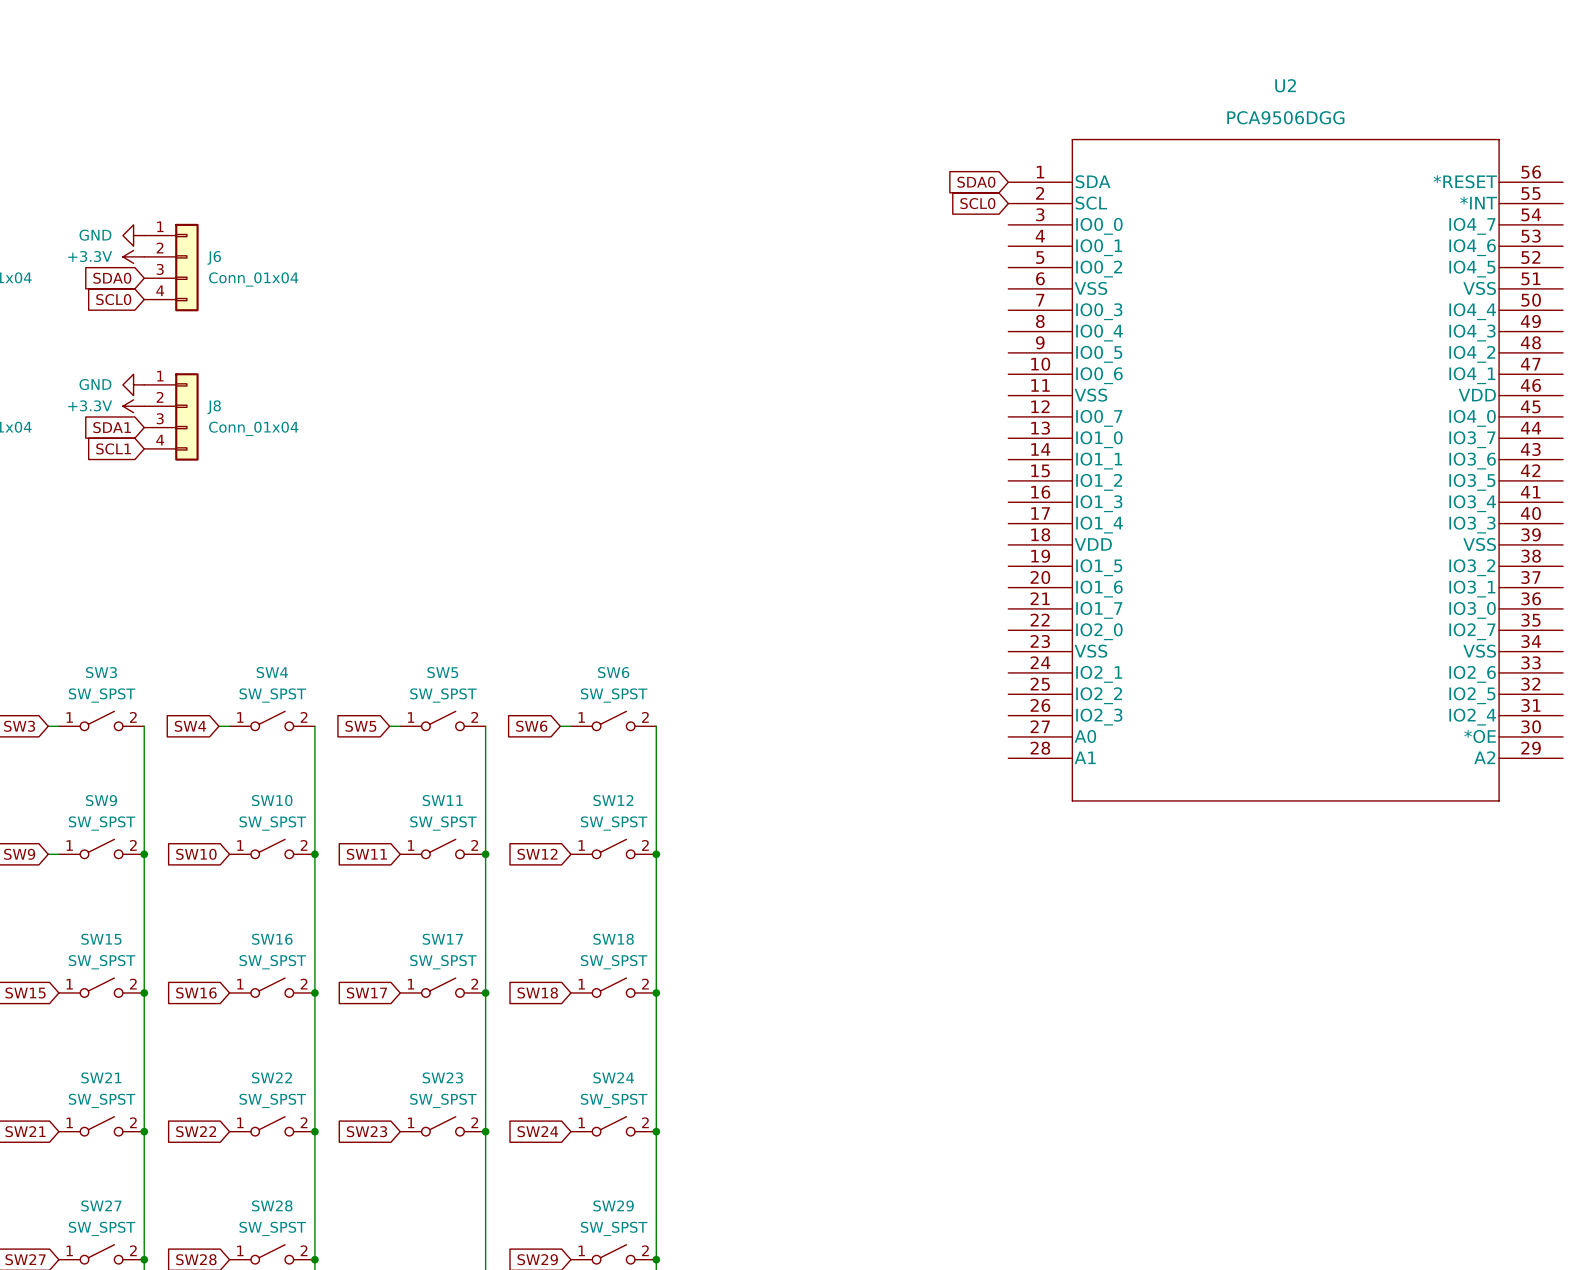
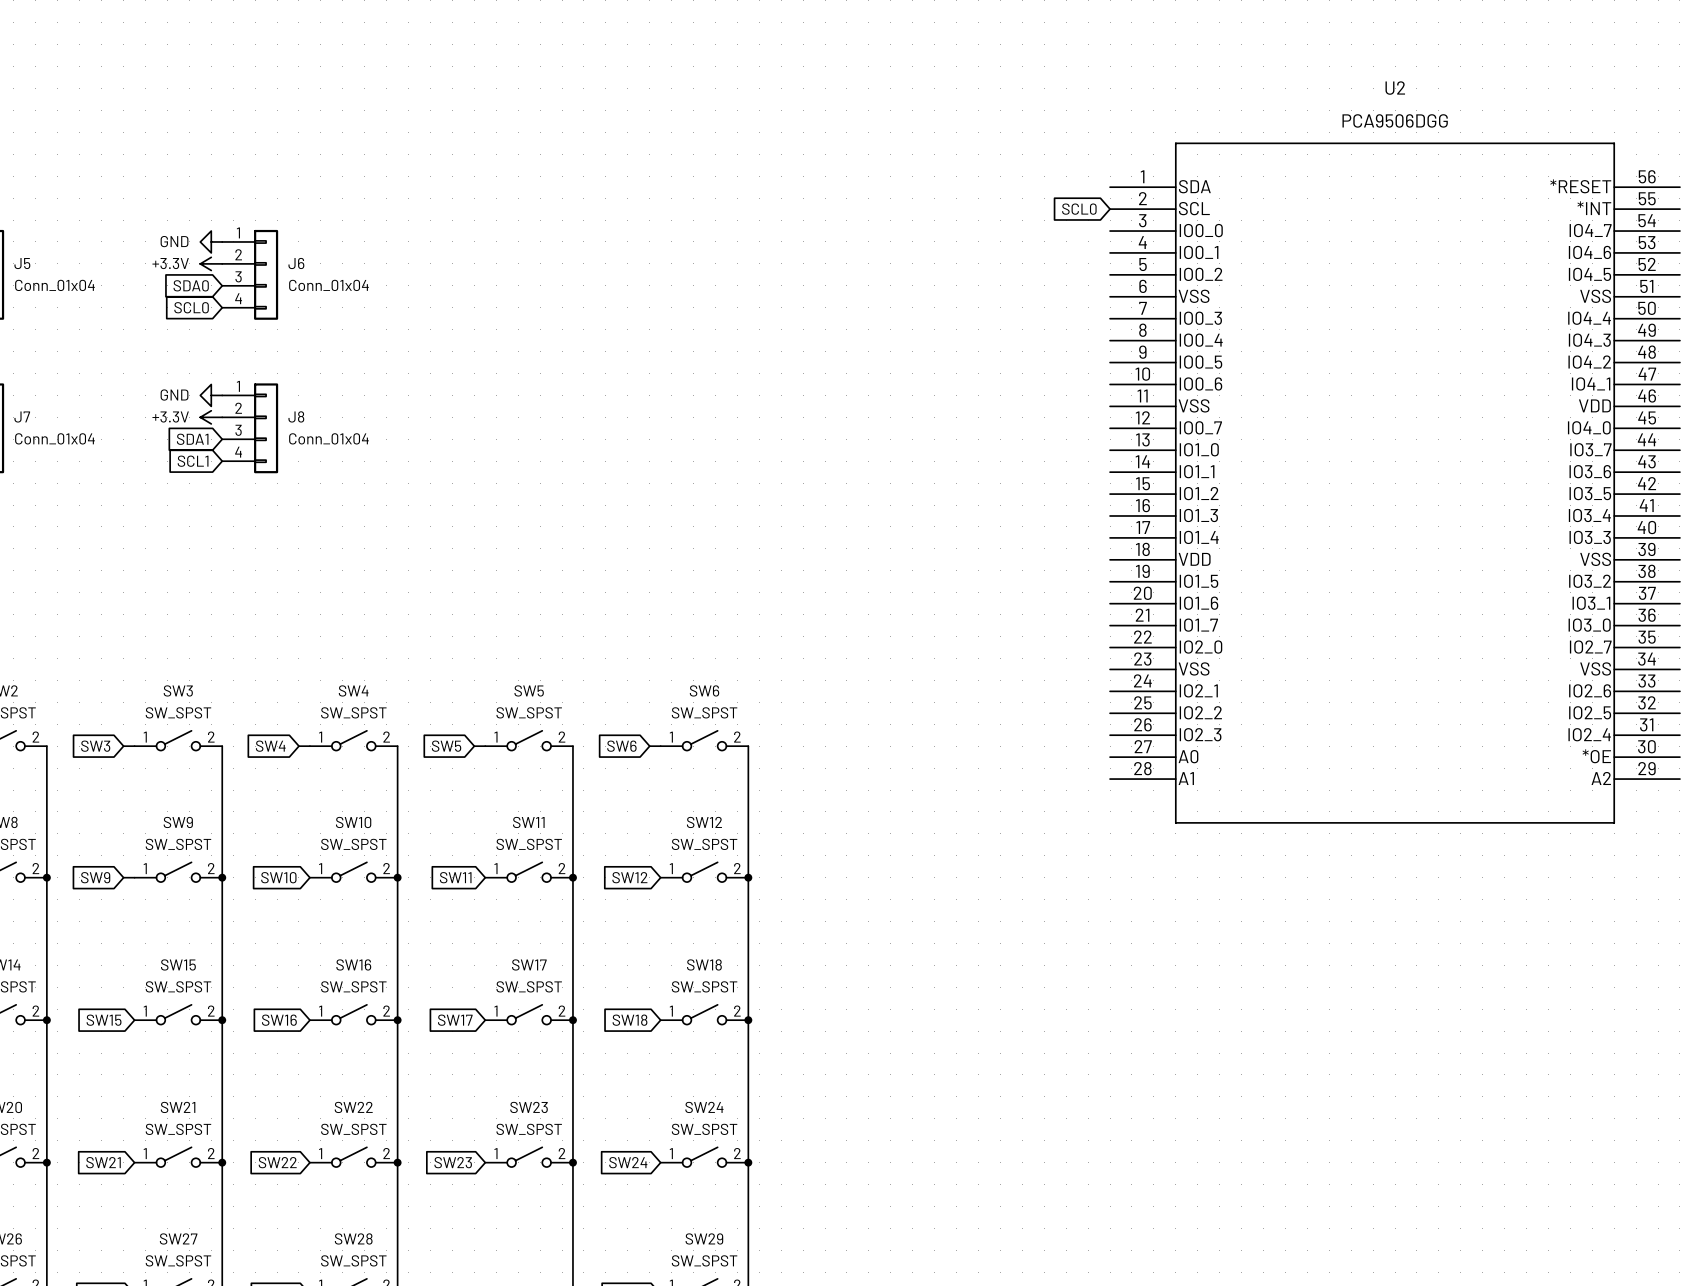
global label: SDA0 (976, 182) -> none

